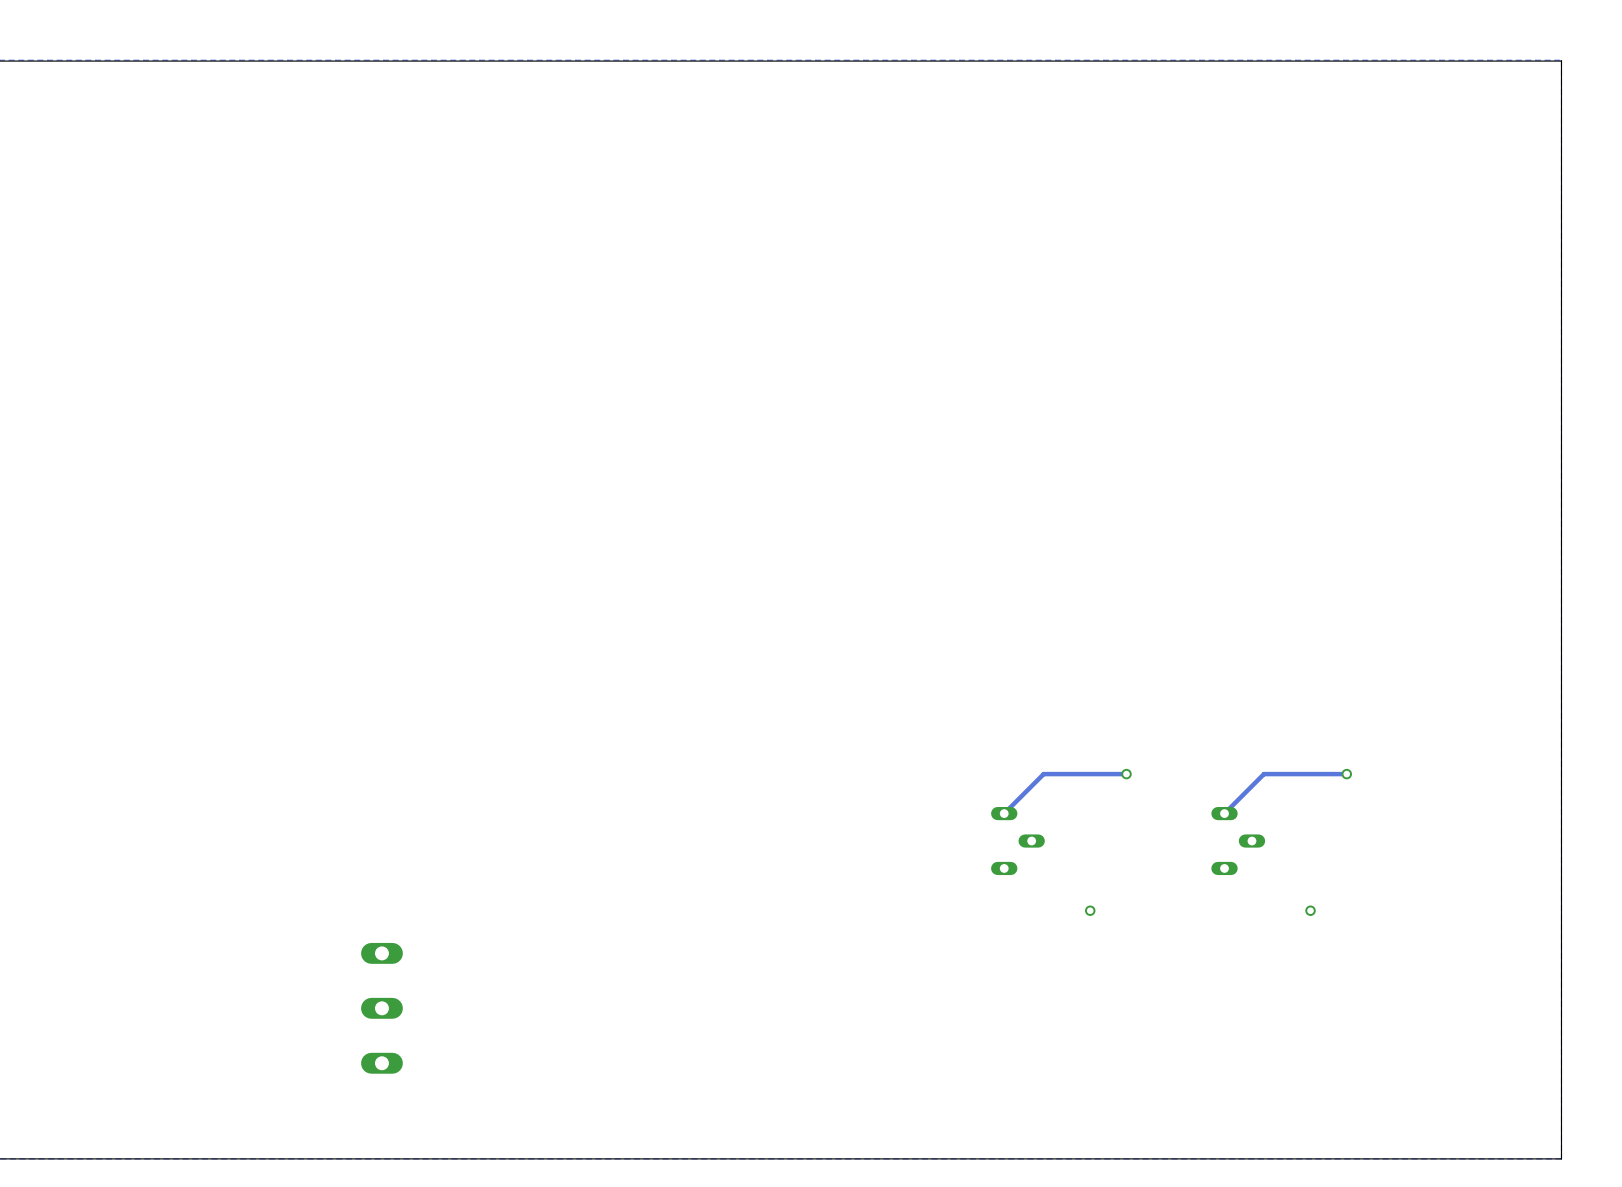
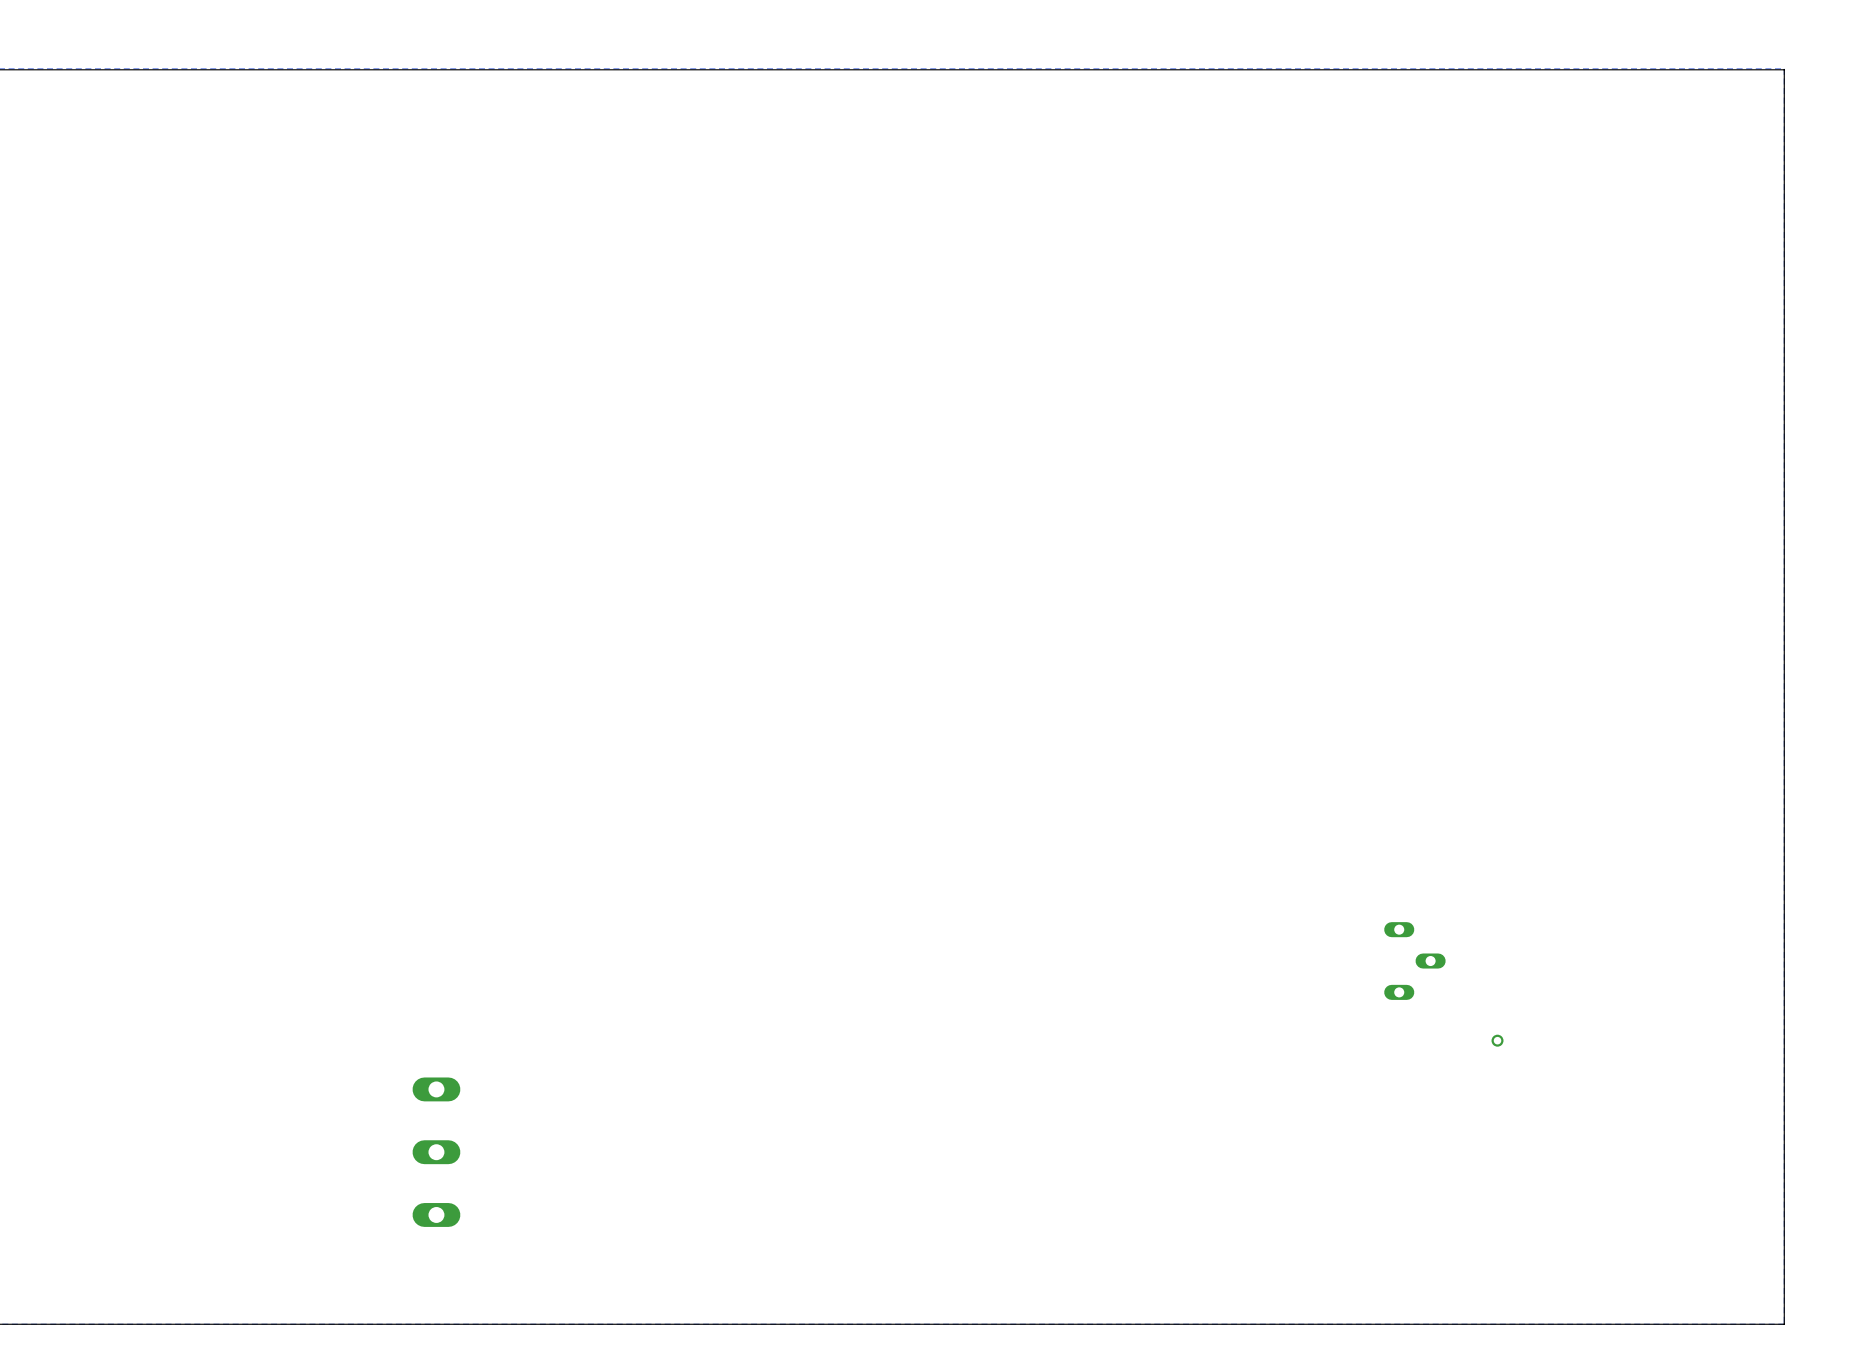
track: (1126, 774) (1043, 774) (1004, 813) -> none
via: (1126, 774) -> none
track: (1346, 774) (1263, 774) (1224, 813) -> none
via: (1346, 774) -> none
part: (1017, 841) -> none
via: (1090, 910) -> none

